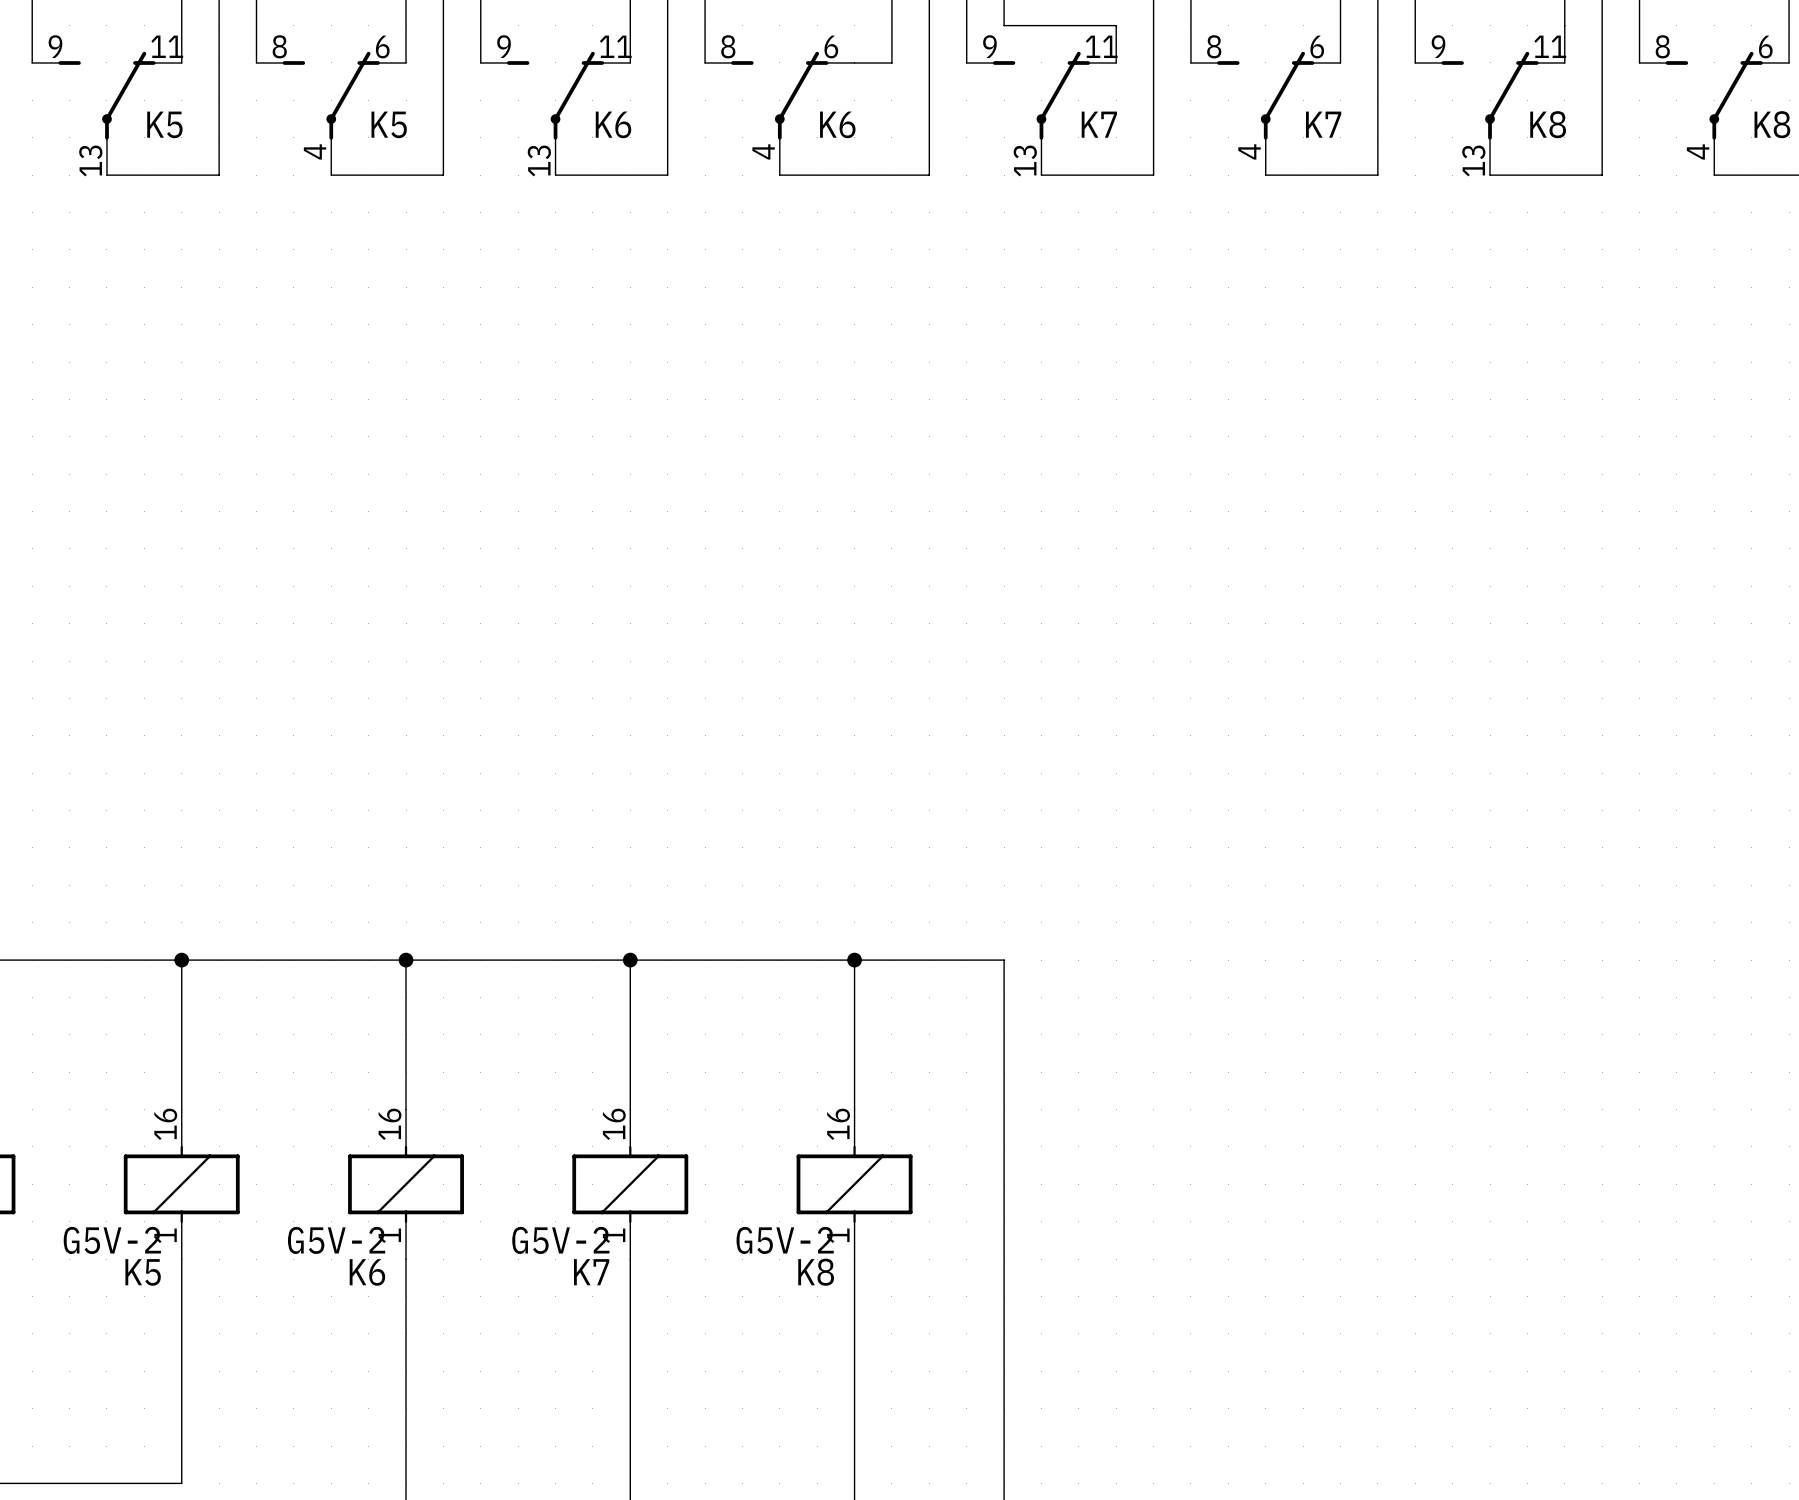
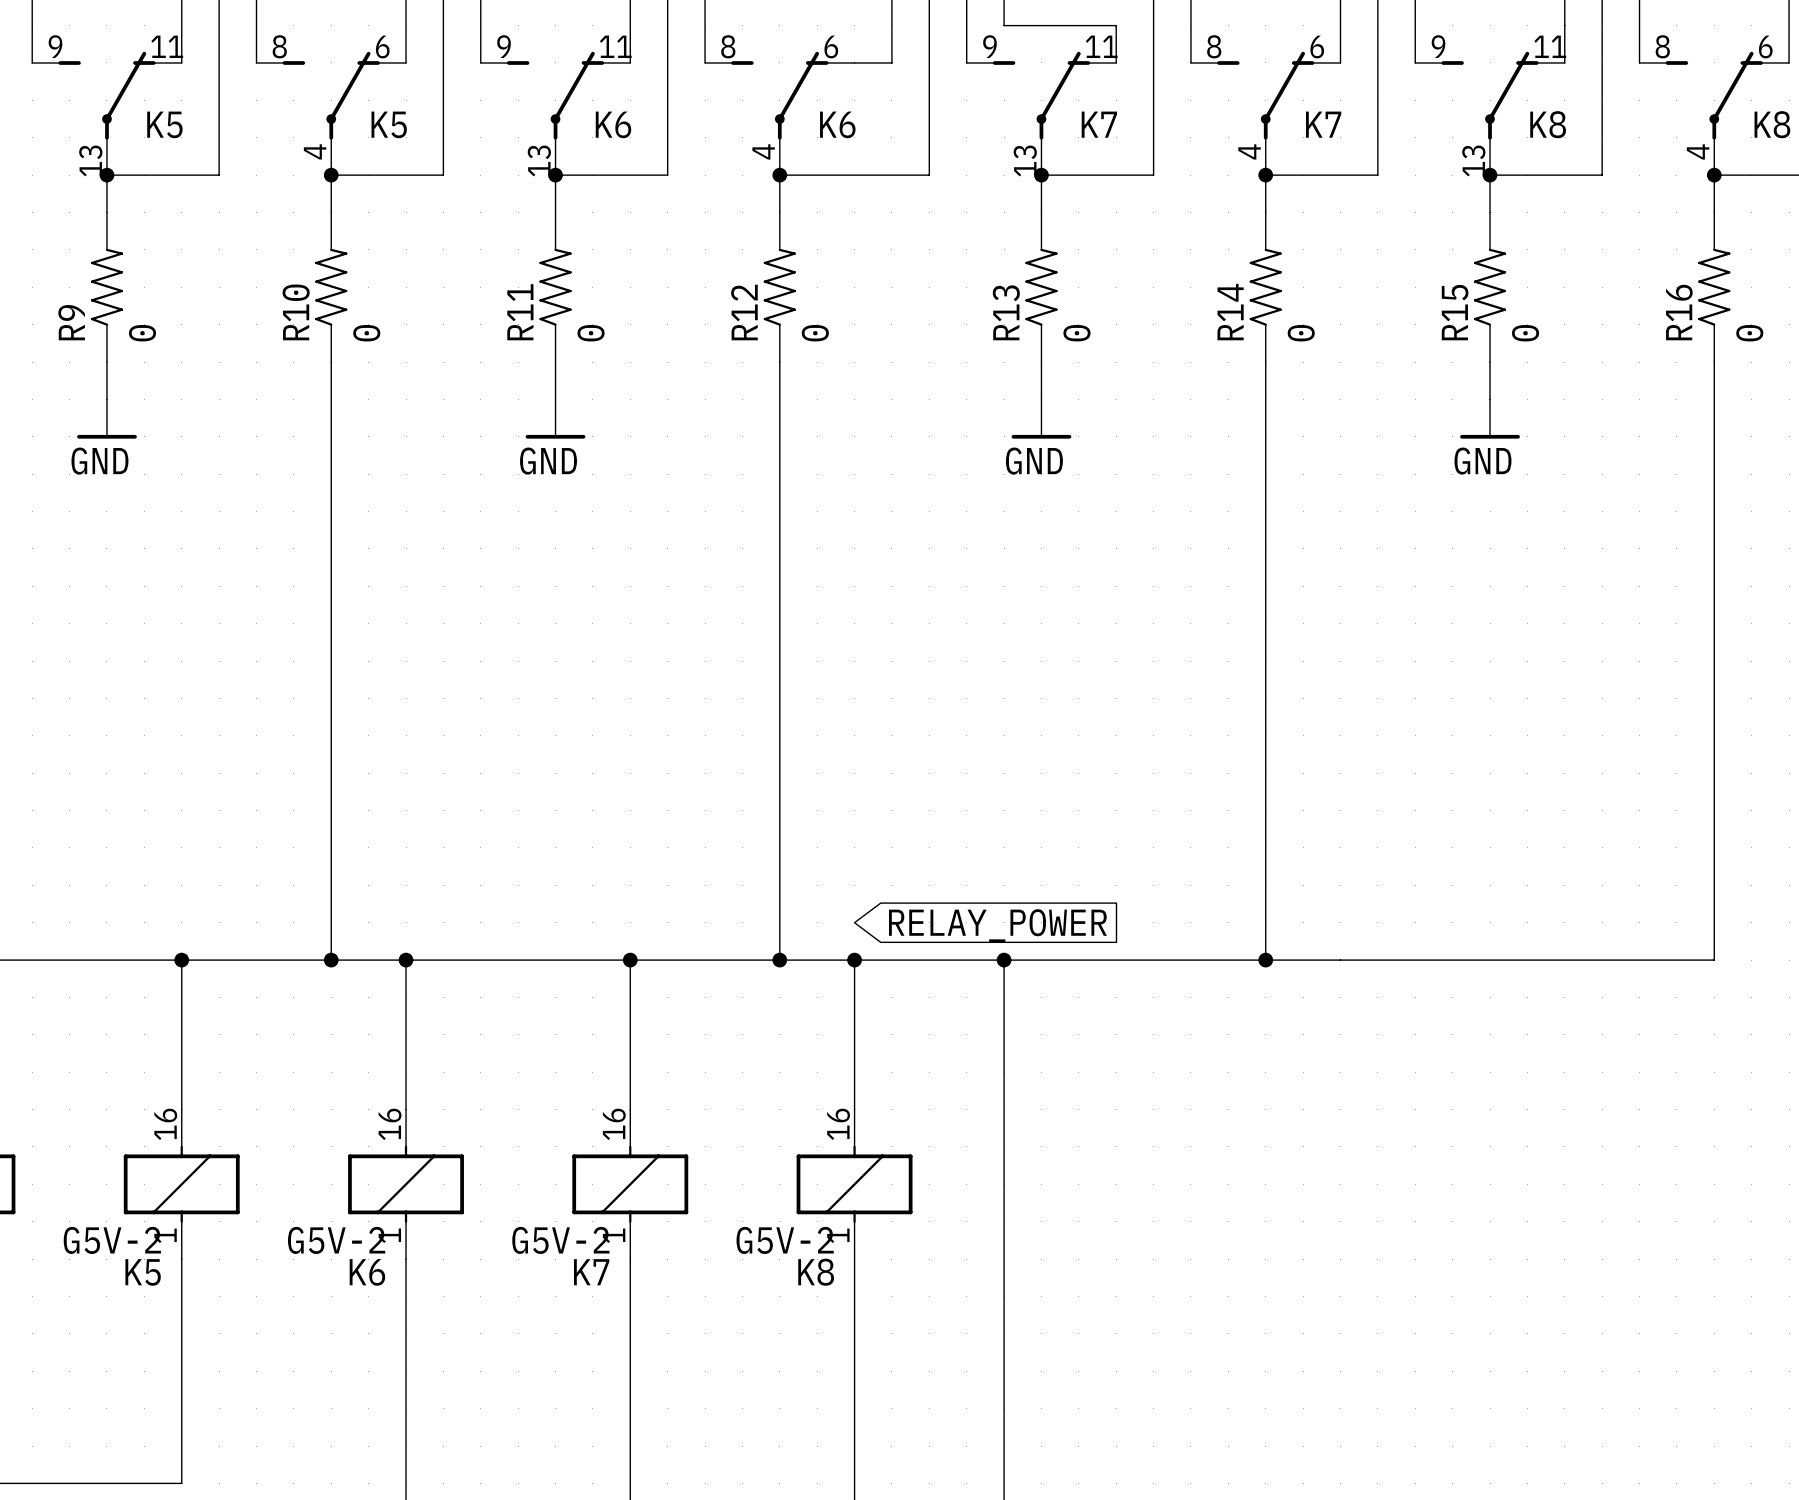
wire: none -> (106, 175) (106, 212)
junction: none -> (106, 175)
wire: none -> (331, 175) (331, 212)
junction: none -> (331, 175)
wire: none -> (555, 175) (555, 212)
junction: none -> (555, 175)
wire: none -> (779, 175) (779, 212)
junction: none -> (779, 175)
wire: none -> (1041, 175) (1041, 212)
junction: none -> (1041, 175)
wire: none -> (1265, 175) (1265, 212)
junction: none -> (1265, 175)
wire: none -> (1490, 175) (1490, 212)
junction: none -> (1490, 175)
wire: none -> (1714, 175) (1714, 212)
junction: none -> (1714, 175)
R9: none -> 0 (106, 287)
R10: none -> 0 (331, 287)
R11: none -> 0 (555, 287)
R12: none -> 0 (779, 287)
R13: none -> 0 (1041, 287)
R14: none -> 0 (1265, 287)
R15: none -> 0 (1490, 287)
R16: none -> 0 (1714, 287)
wire: none -> (106, 362) (106, 399)
wire: none -> (331, 362) (331, 960)
wire: none -> (555, 362) (555, 399)
wire: none -> (779, 362) (779, 960)
wire: none -> (1041, 362) (1041, 399)
wire: none -> (1265, 362) (1265, 960)
wire: none -> (1490, 362) (1490, 399)
wire: none -> (1714, 362) (1714, 960) (1004, 960)
power symbol: none -> GND (106, 419)
power symbol: none -> GND (555, 419)
power symbol: none -> GND (1041, 419)
power symbol: none -> GND (1490, 419)
global label: none -> RELAY_POWER (997, 925)
junction: none -> (331, 960)
junction: none -> (779, 960)
junction: none -> (1004, 960)
junction: none -> (1265, 960)

